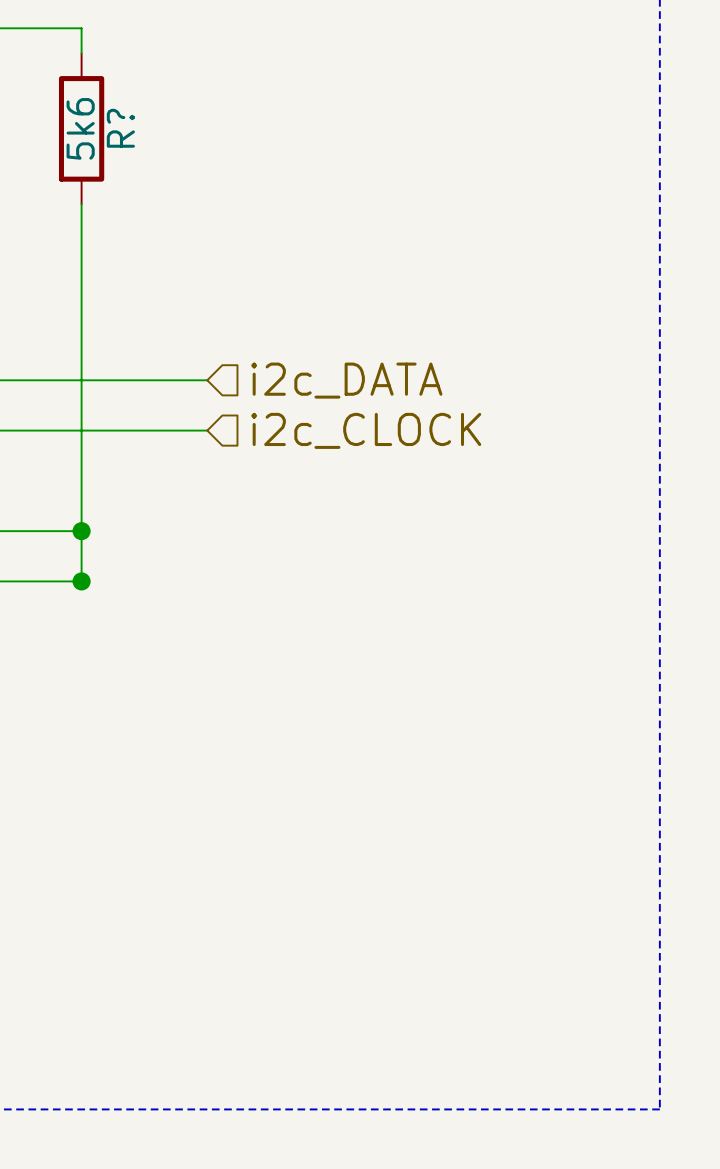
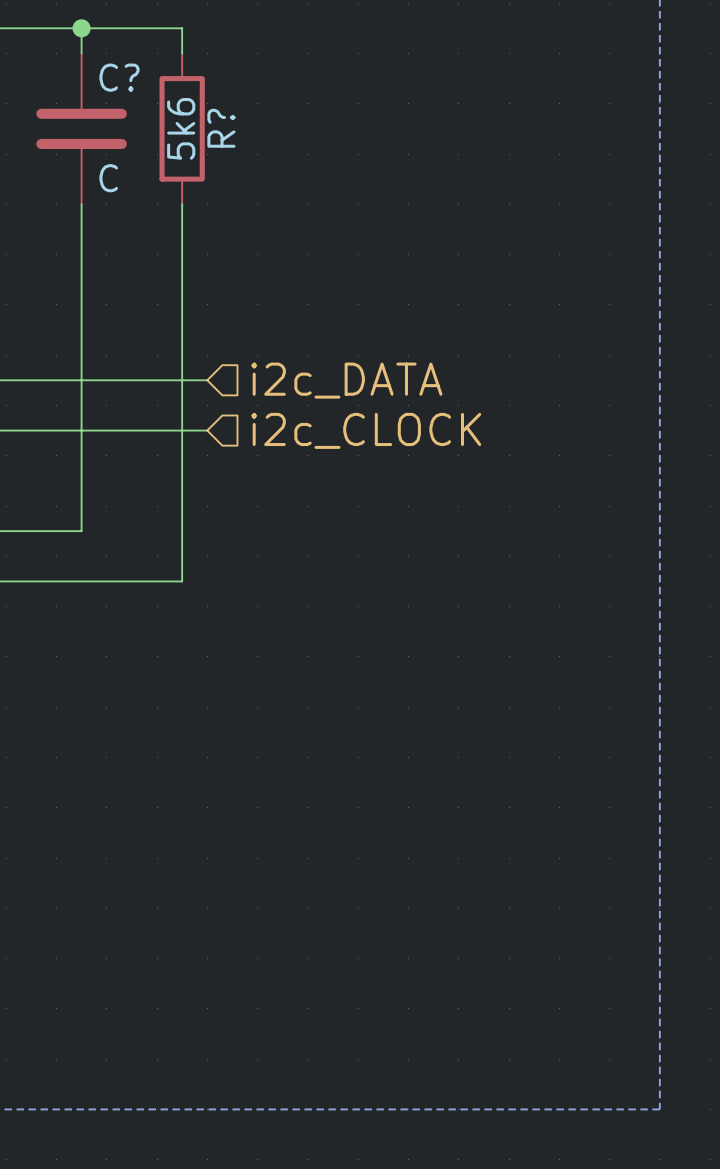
wire: none -> (81, 28) (182, 28) (182, 53)
junction: none -> (81, 28)
R? position: (81, 128) -> (182, 128)
C?: none -> C (81, 128)
wire: (81, 531) (81, 581) -> (182, 204) (182, 581) (81, 581)
junction: (81, 531) -> none
junction: (81, 581) -> none

